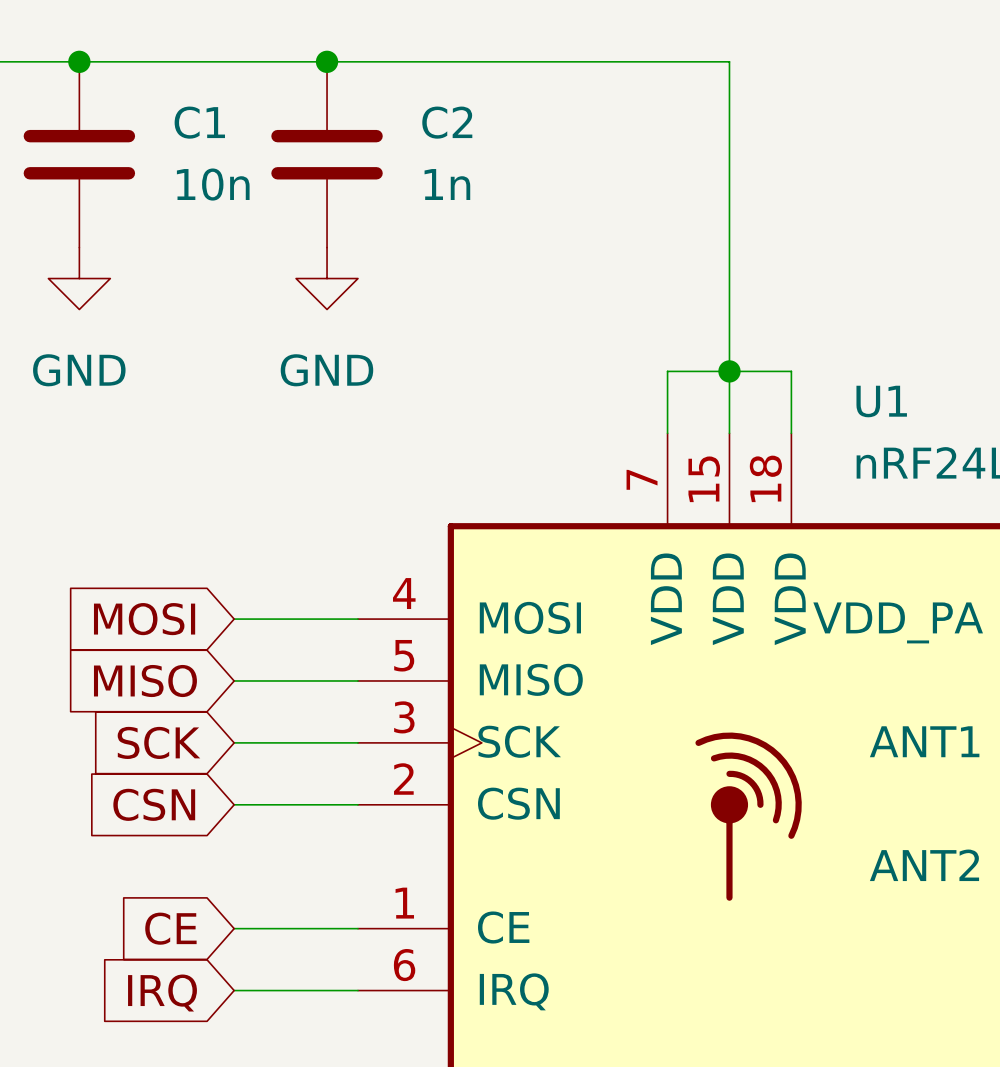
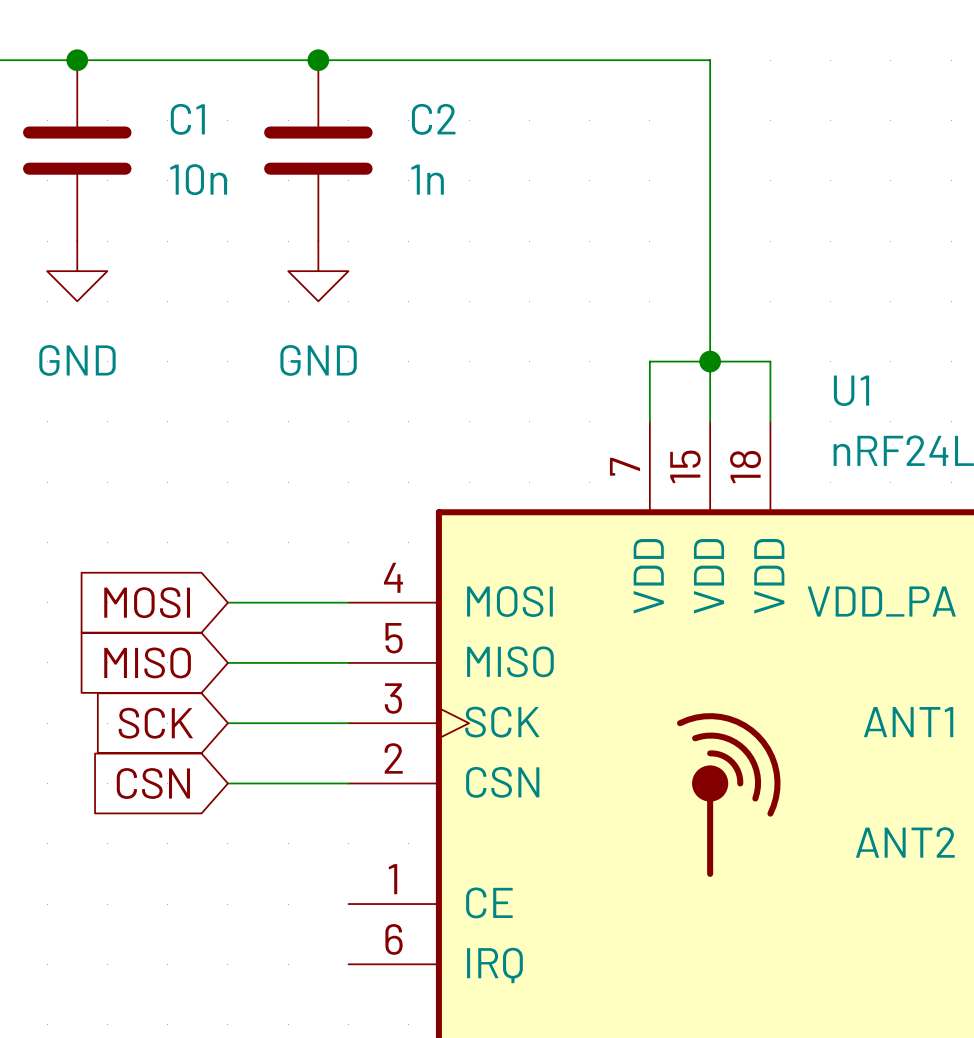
global label: CE (170, 928) -> none
wire: (234, 928) (357, 928) -> none
wire: (234, 990) (357, 990) -> none
global label: IRQ (162, 993) -> none

